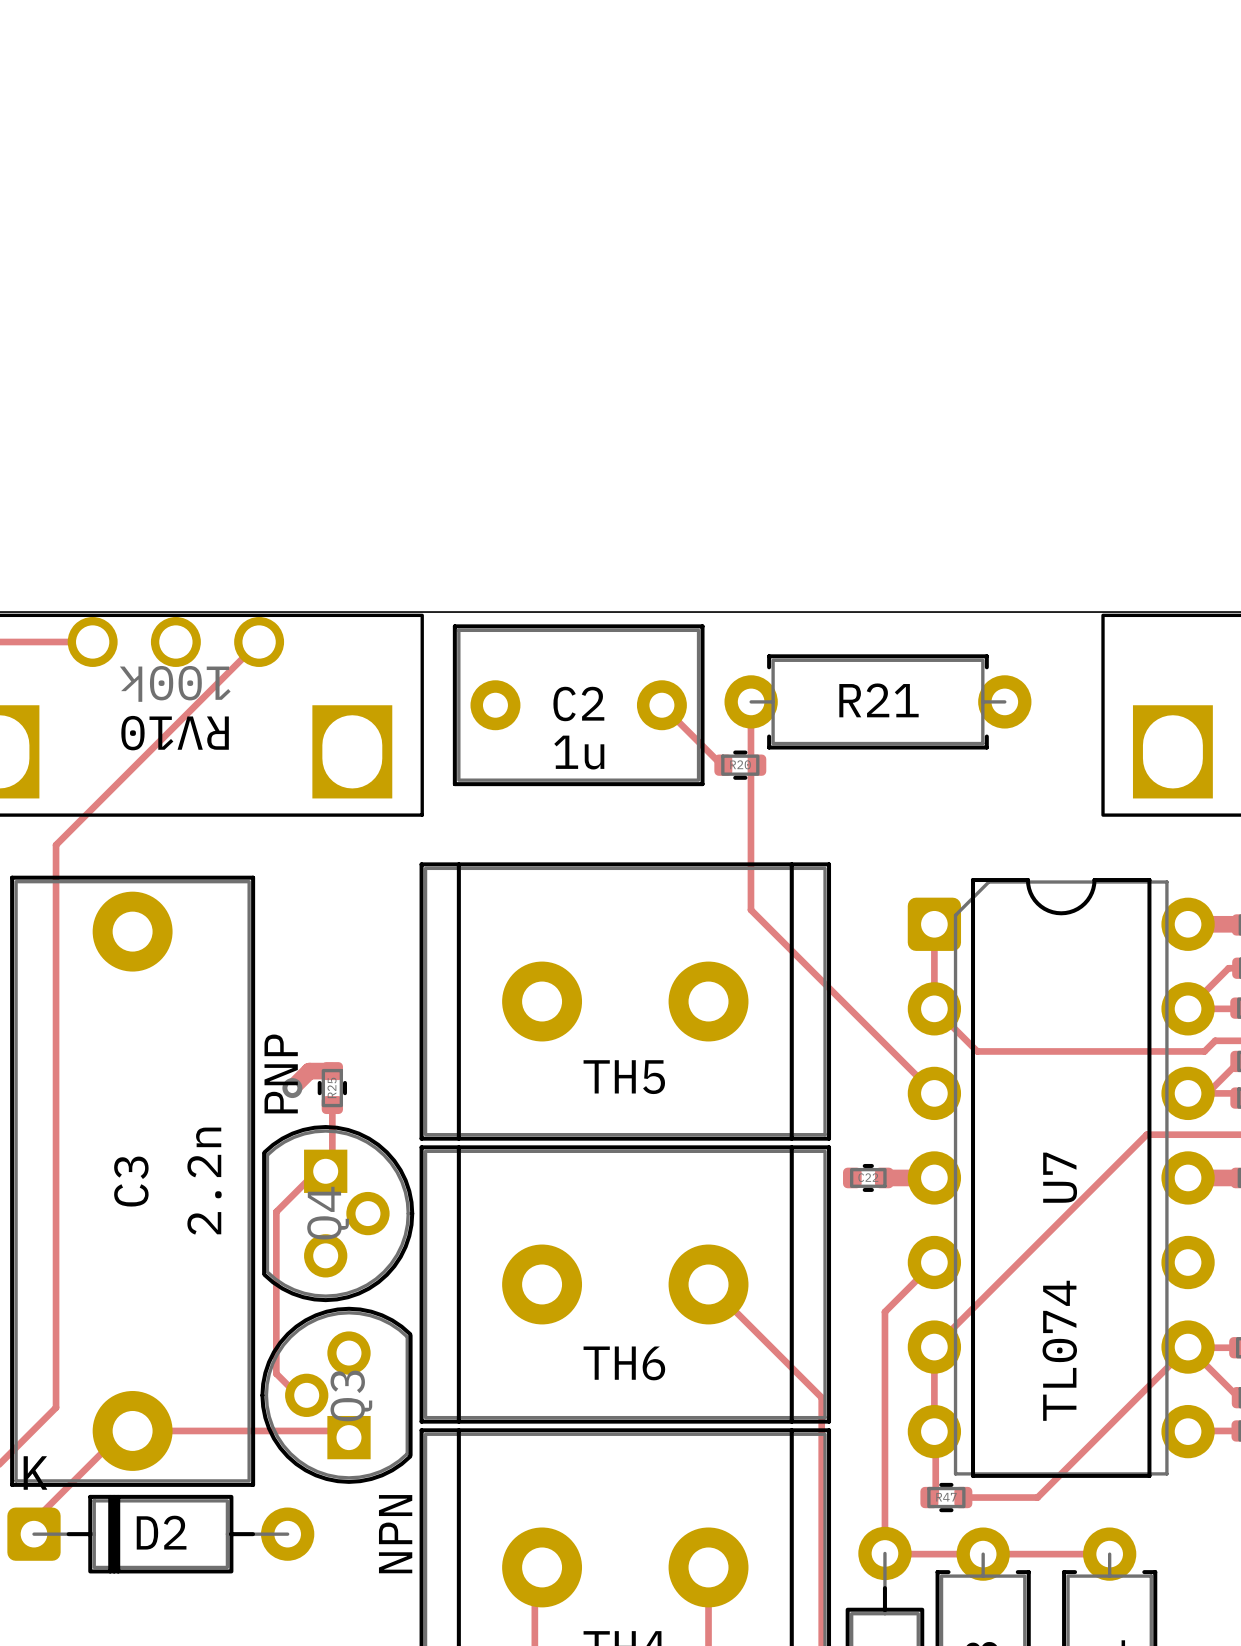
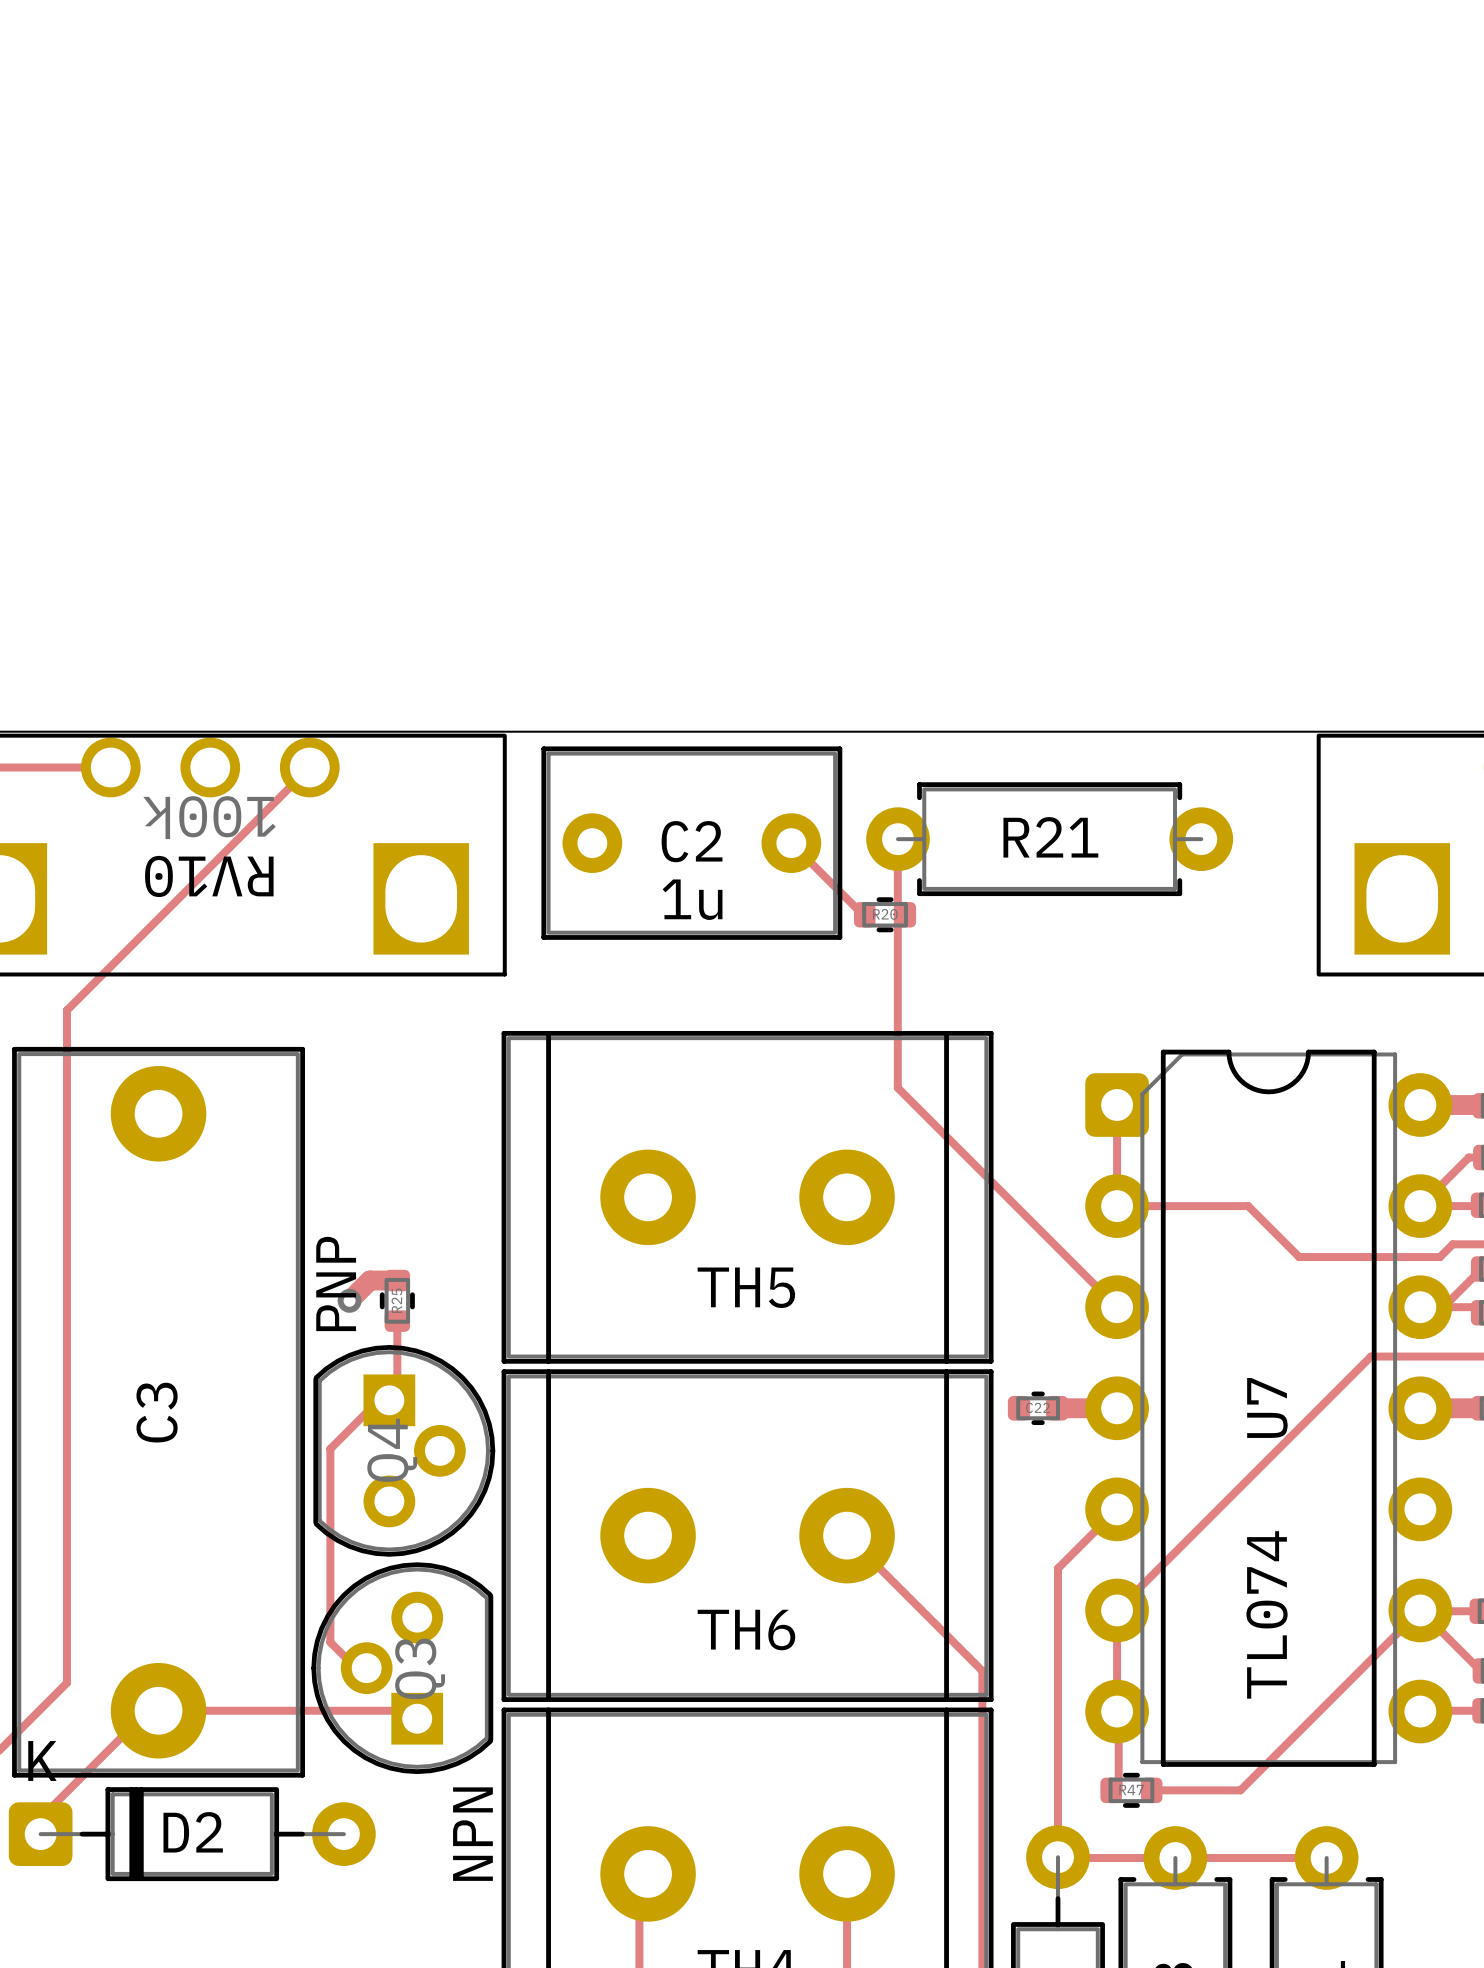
track: (934, 1008) (977, 1051) (1086, 1051) -> (1117, 1206) (1248, 1206) (1299, 1257)
C3 value: 2.2n (204, 1181) -> none

